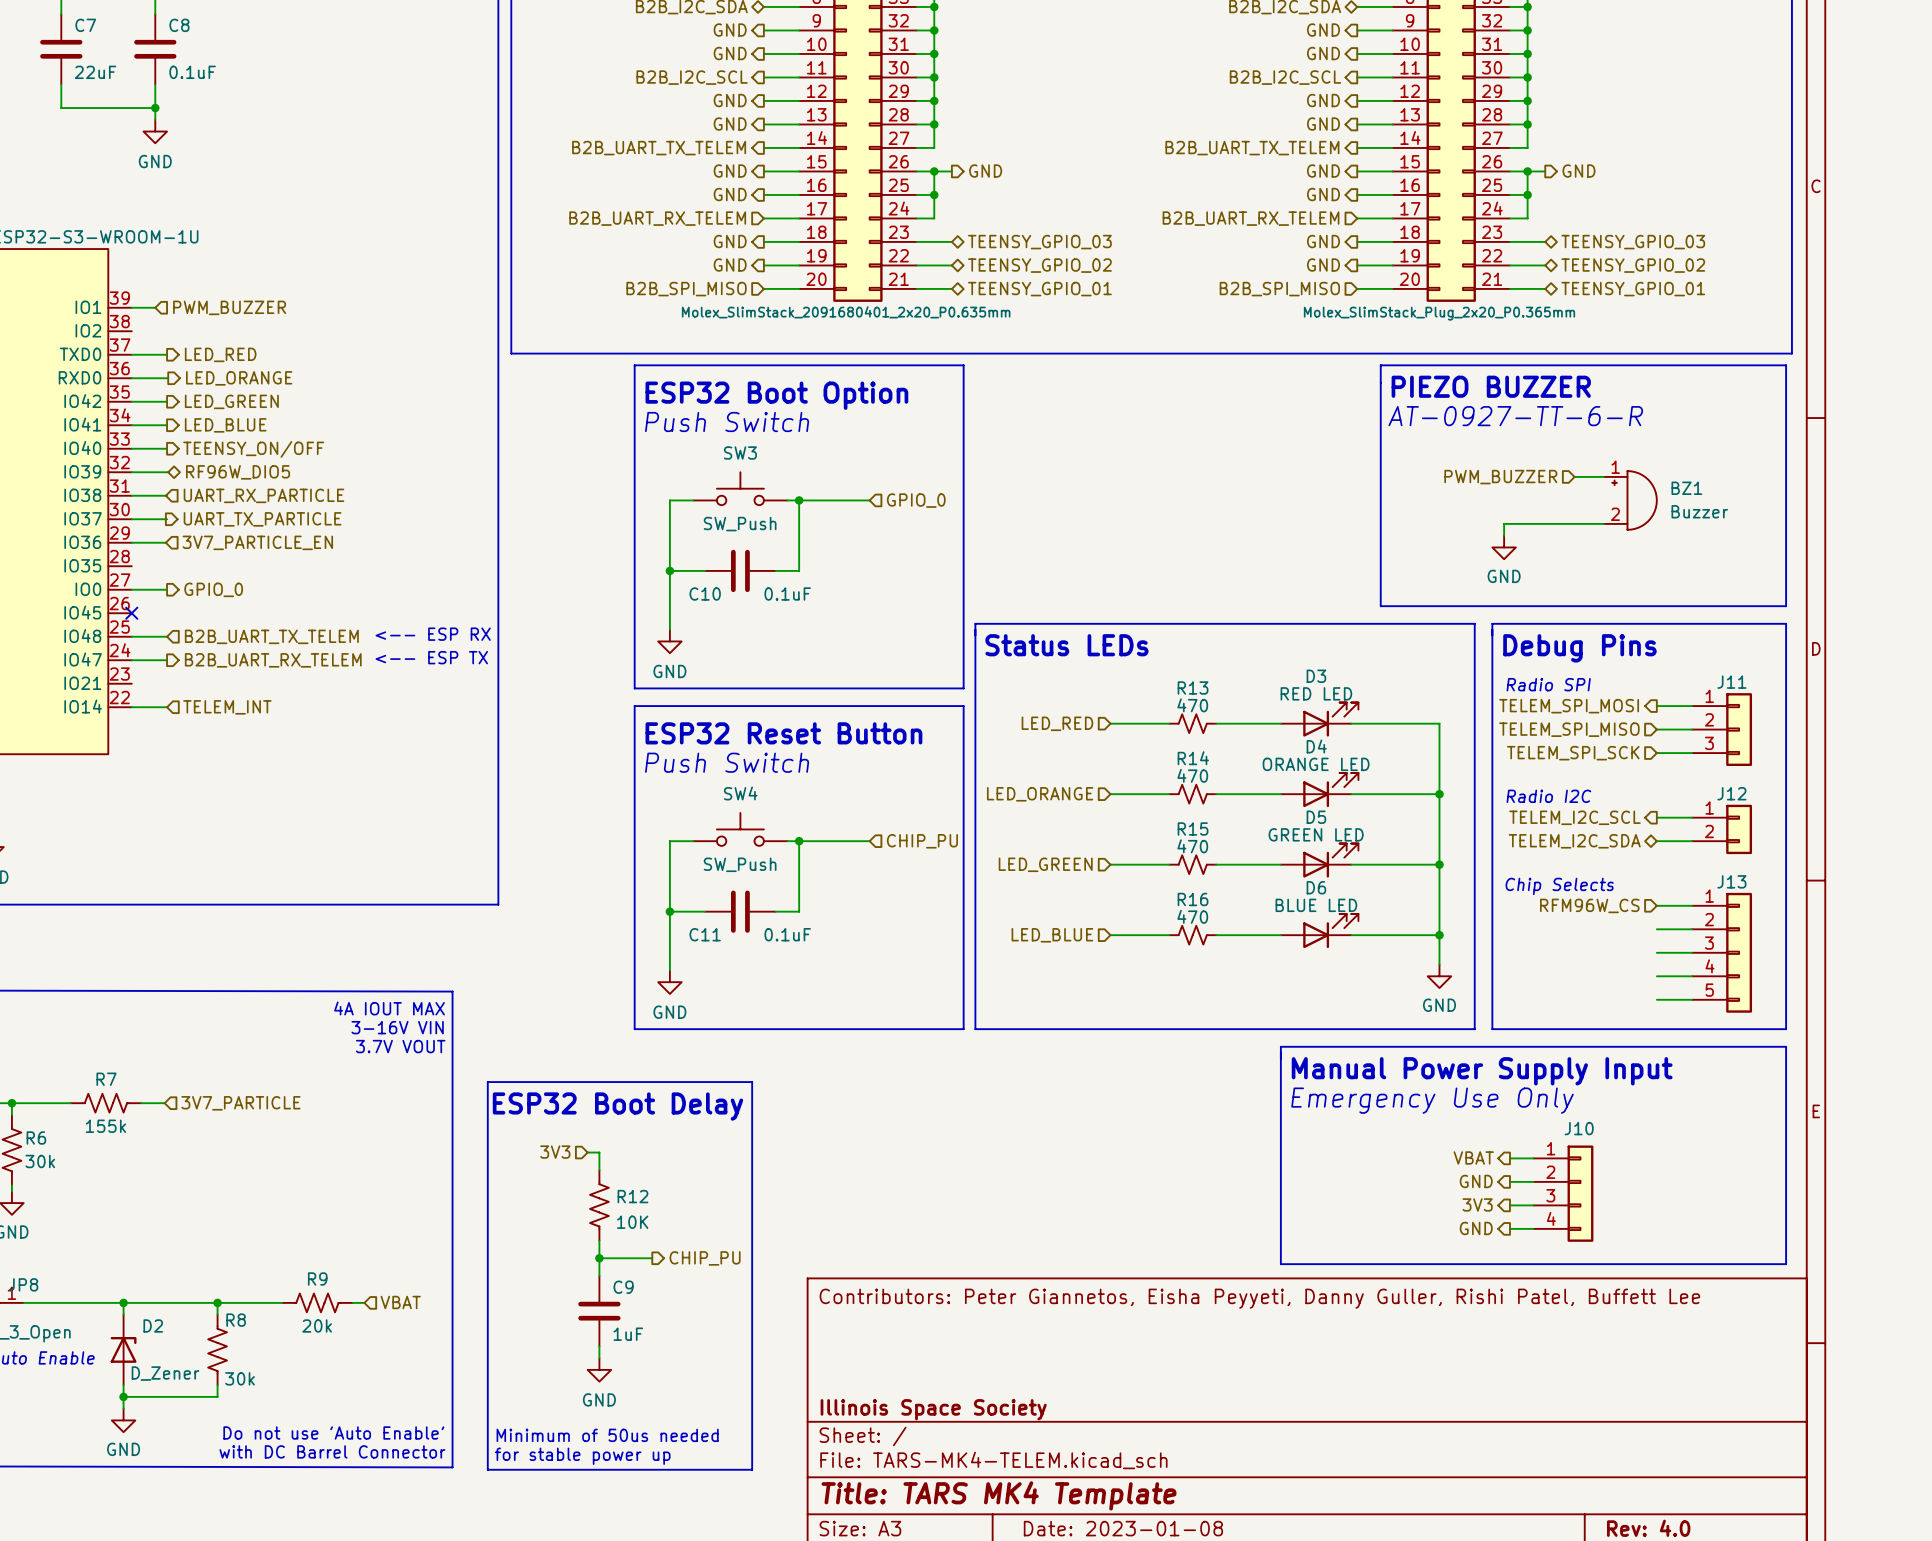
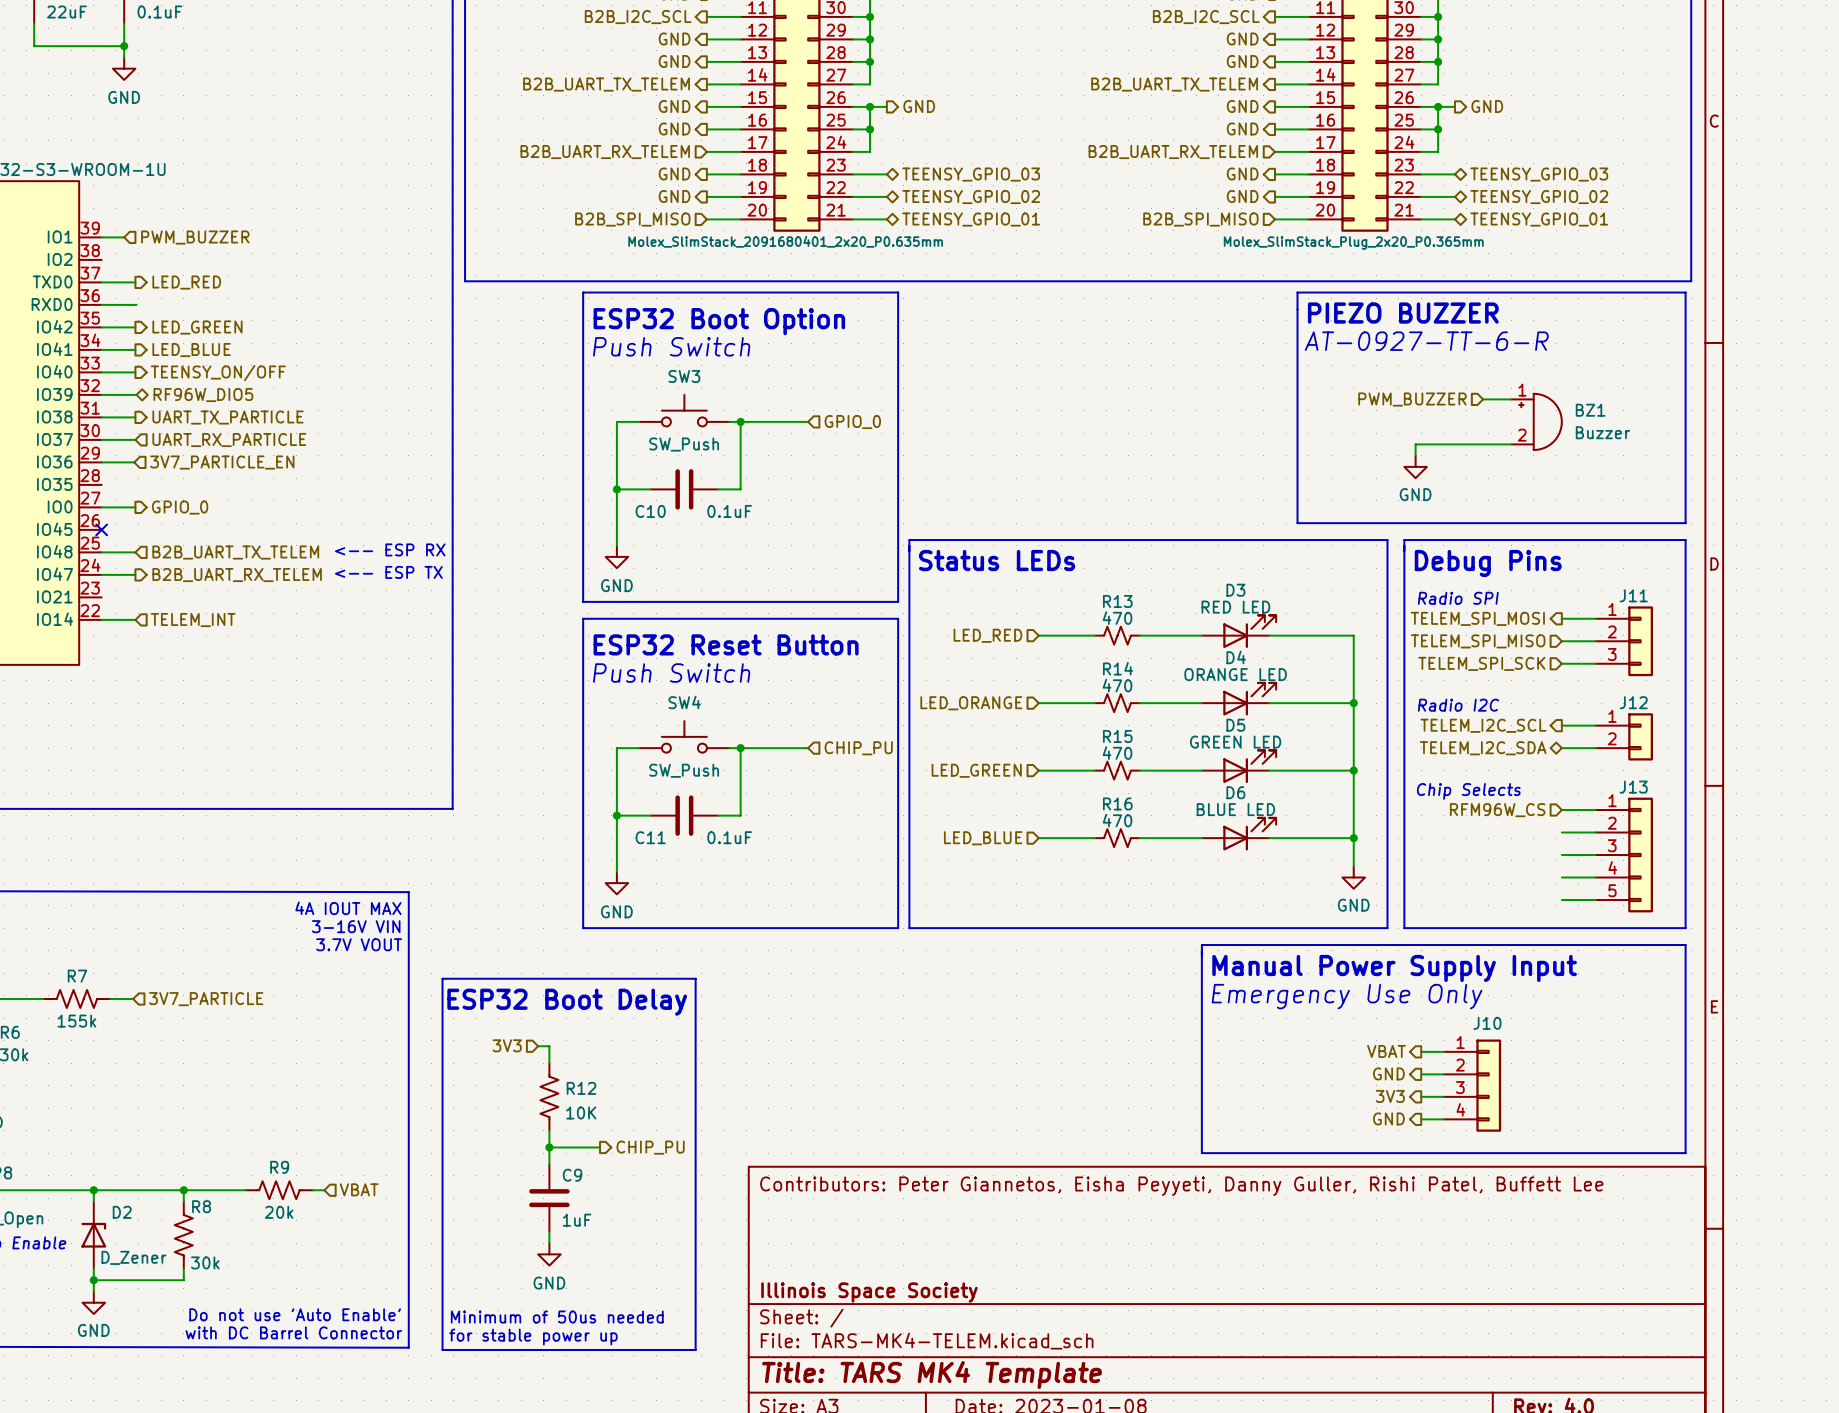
hierarchical label: LED_ORANGE (239, 378) -> none
hierarchical label shape: input (263, 495) -> output (228, 417)
hierarchical label: UART_RX_PARTICLE (263, 495) -> UART_TX_PARTICLE (228, 417)
hierarchical label shape: output (262, 519) -> input (229, 440)
hierarchical label: UART_TX_PARTICLE (262, 519) -> UART_RX_PARTICLE (229, 440)

